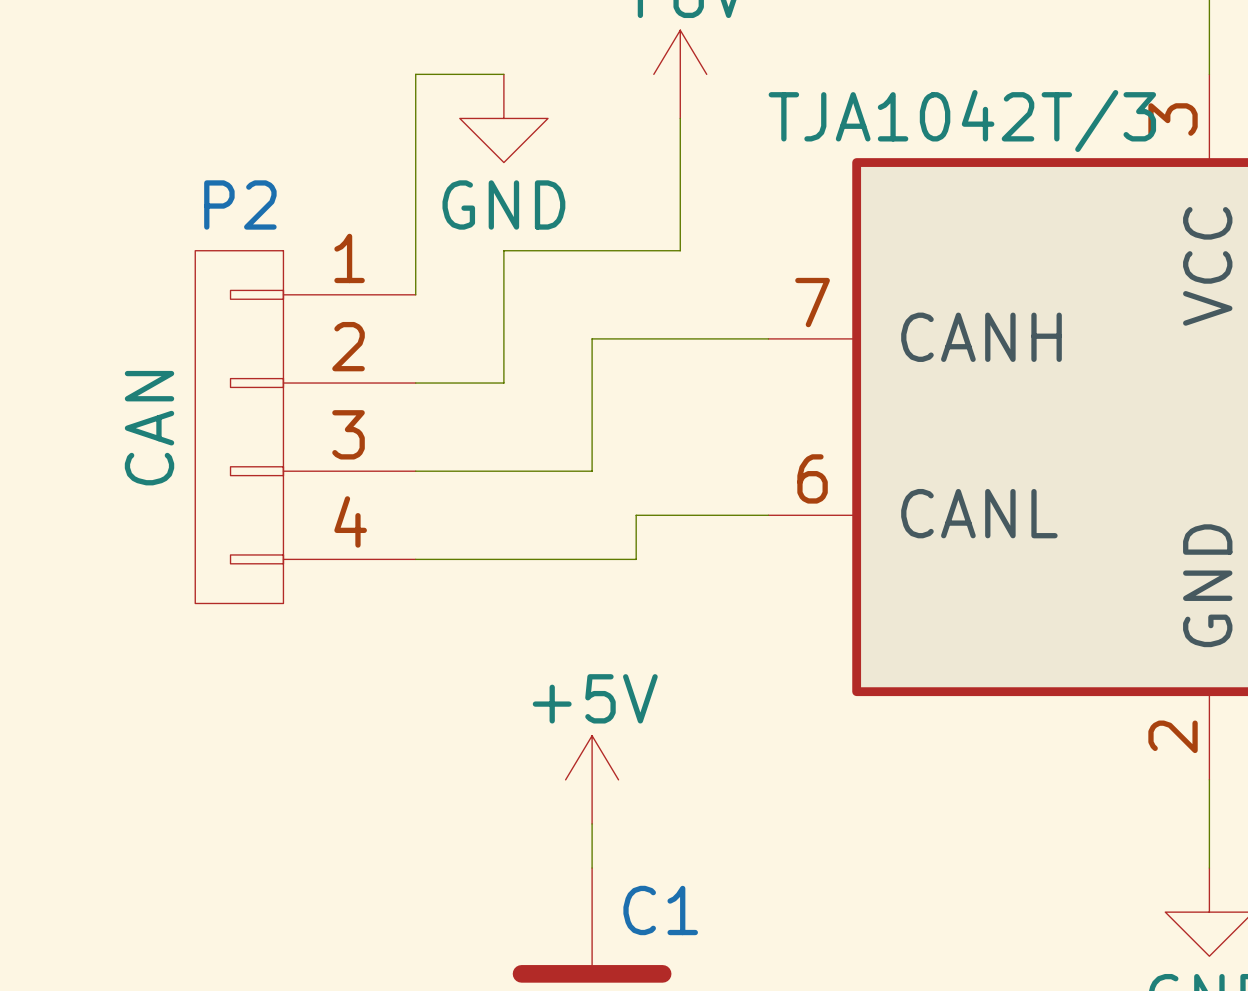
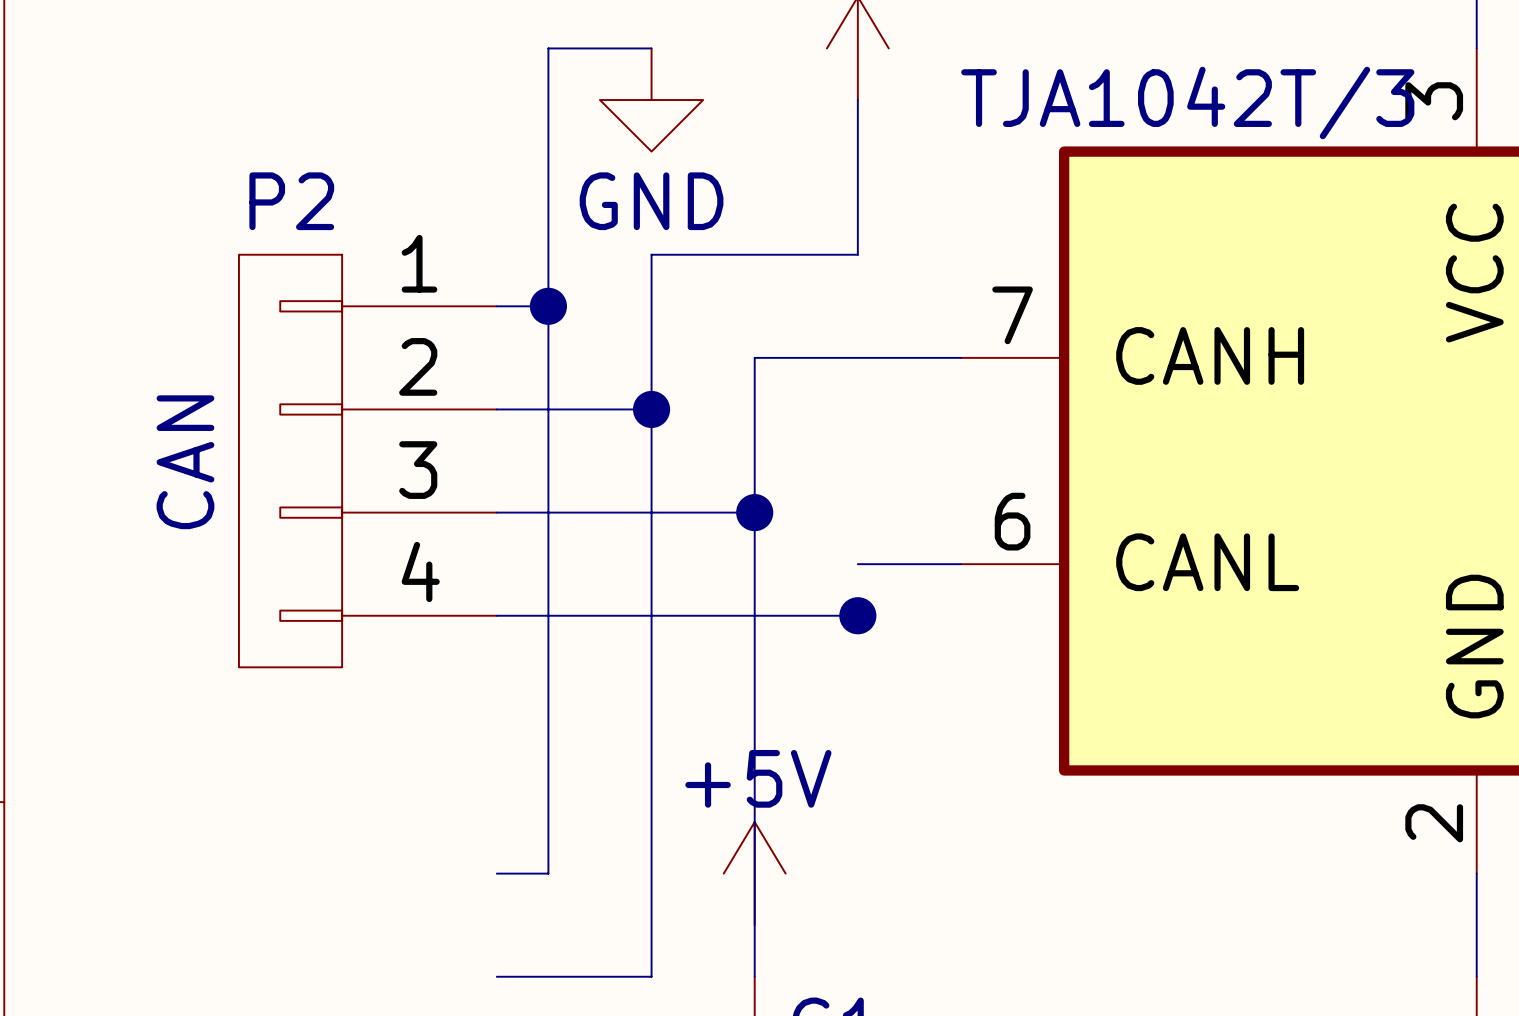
wire: none -> (496, 306) (548, 306) (548, 873) (496, 873)
junction: none -> (548, 306)
wire: none -> (651, 409) (651, 976) (496, 976)
junction: none -> (651, 409)
P2 position: (305, 427) -> (367, 461)
wire: none -> (754, 512) (754, 925)
junction: none -> (754, 512)
wire: (680, 515) (636, 515) (636, 559) -> (857, 615) (806, 615)
junction: none -> (857, 615)

